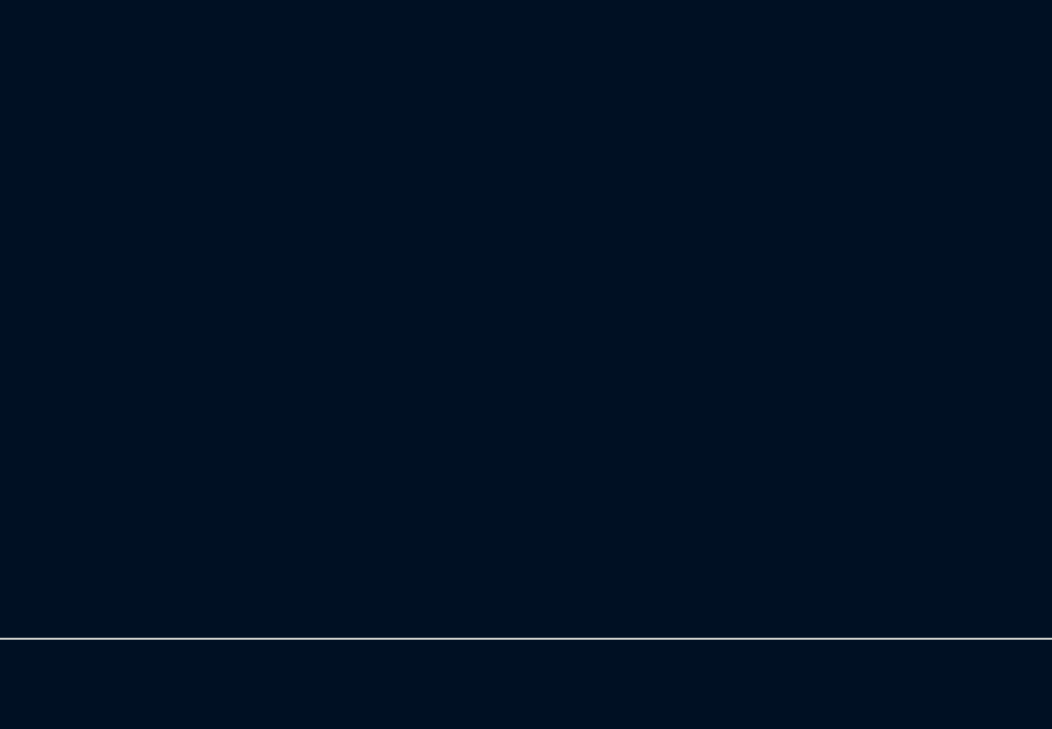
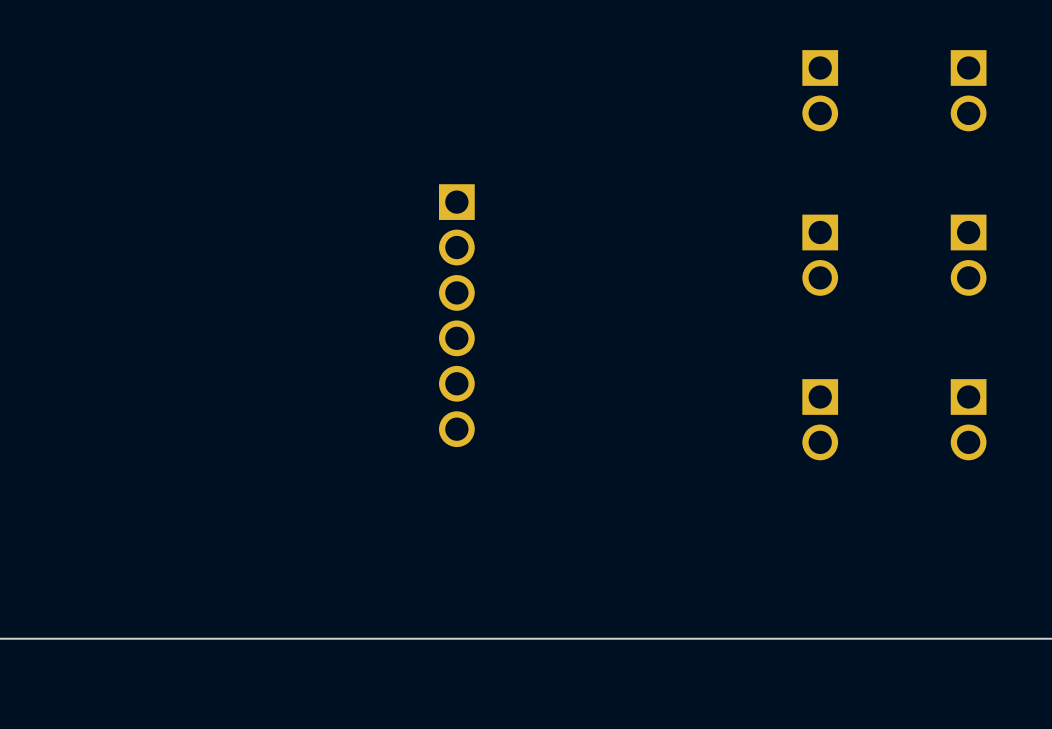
part: none -> (820, 90)
part: none -> (968, 90)
part: none -> (820, 255)
part: none -> (968, 255)
part: none -> (456, 315)
part: none -> (820, 419)
part: none -> (968, 419)

